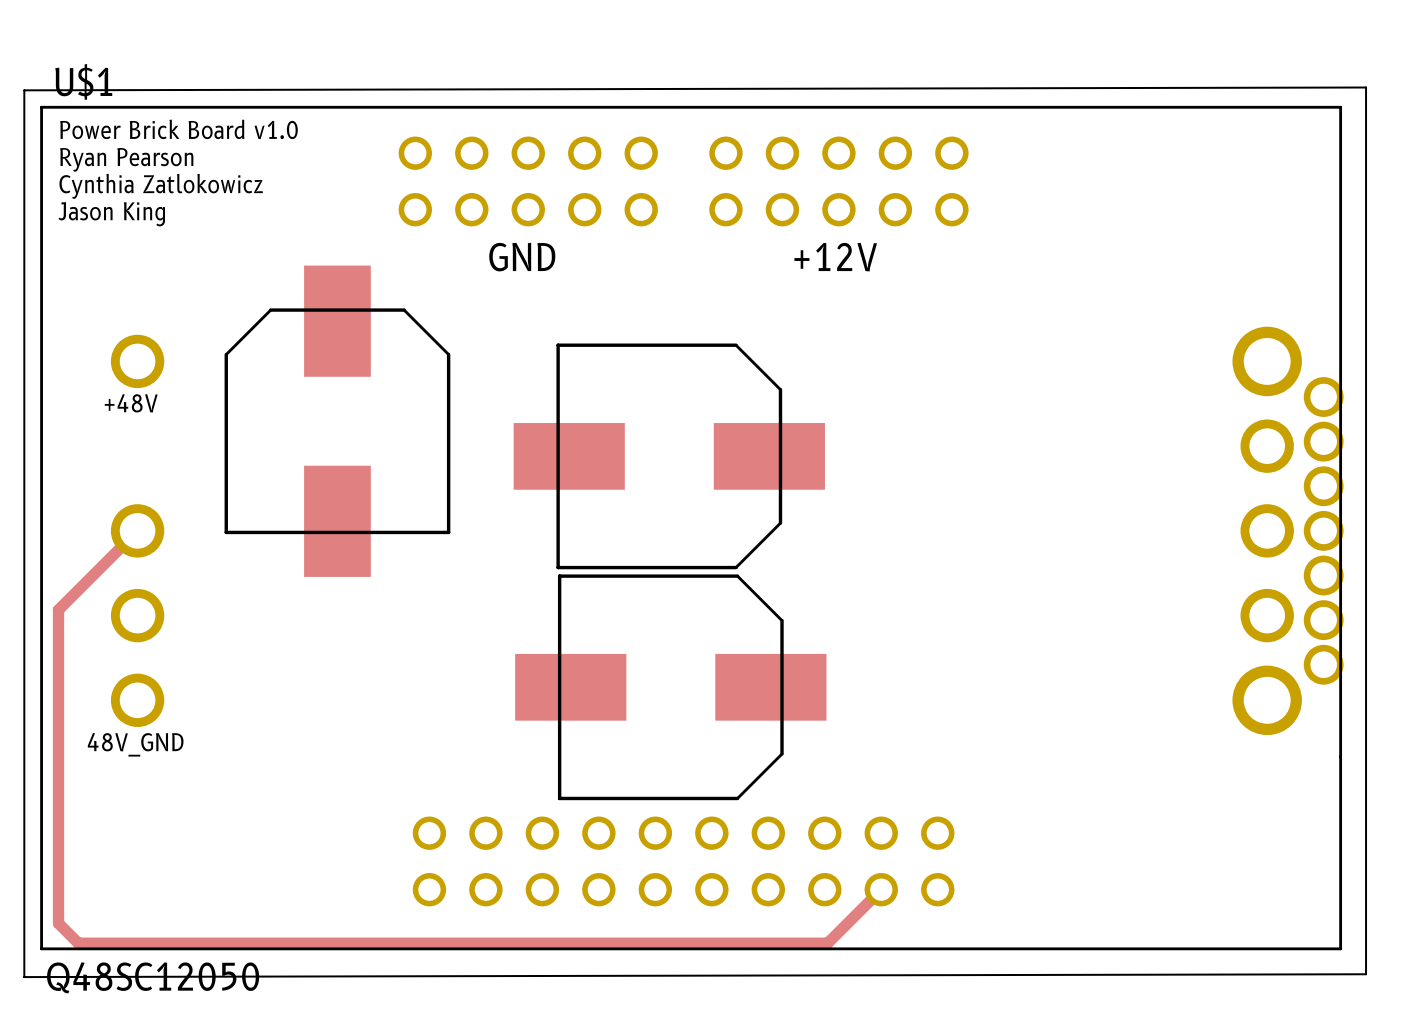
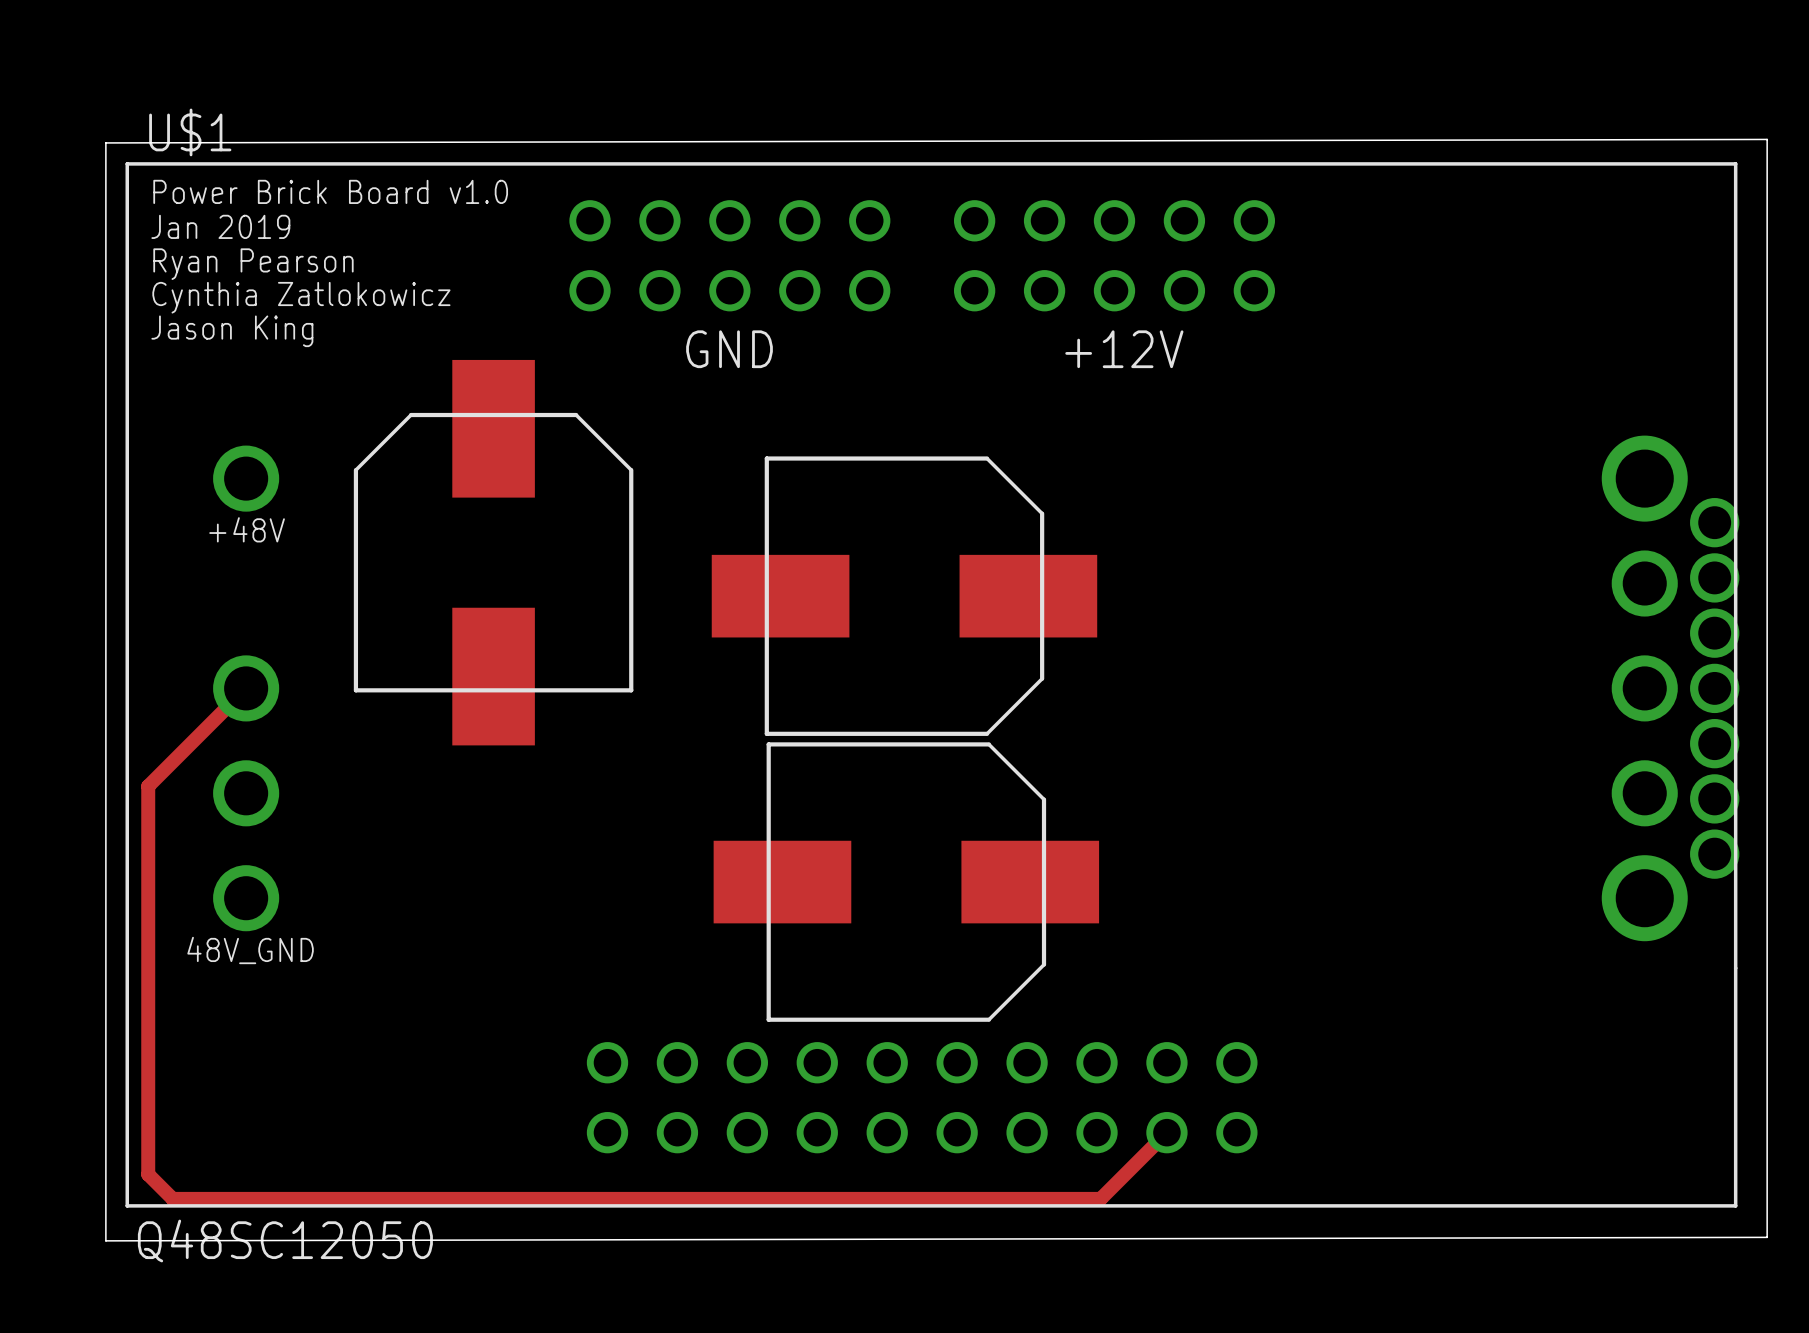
text: Ryan Pearson (126, 159) -> Jan 2019 (220, 226)
text: Cynthia Zatlokowicz (161, 186) -> Ryan Pearson (253, 264)
text: Jason King (111, 214) -> Cynthia Zatlokowicz (301, 297)
text: none -> Jason King (232, 331)

